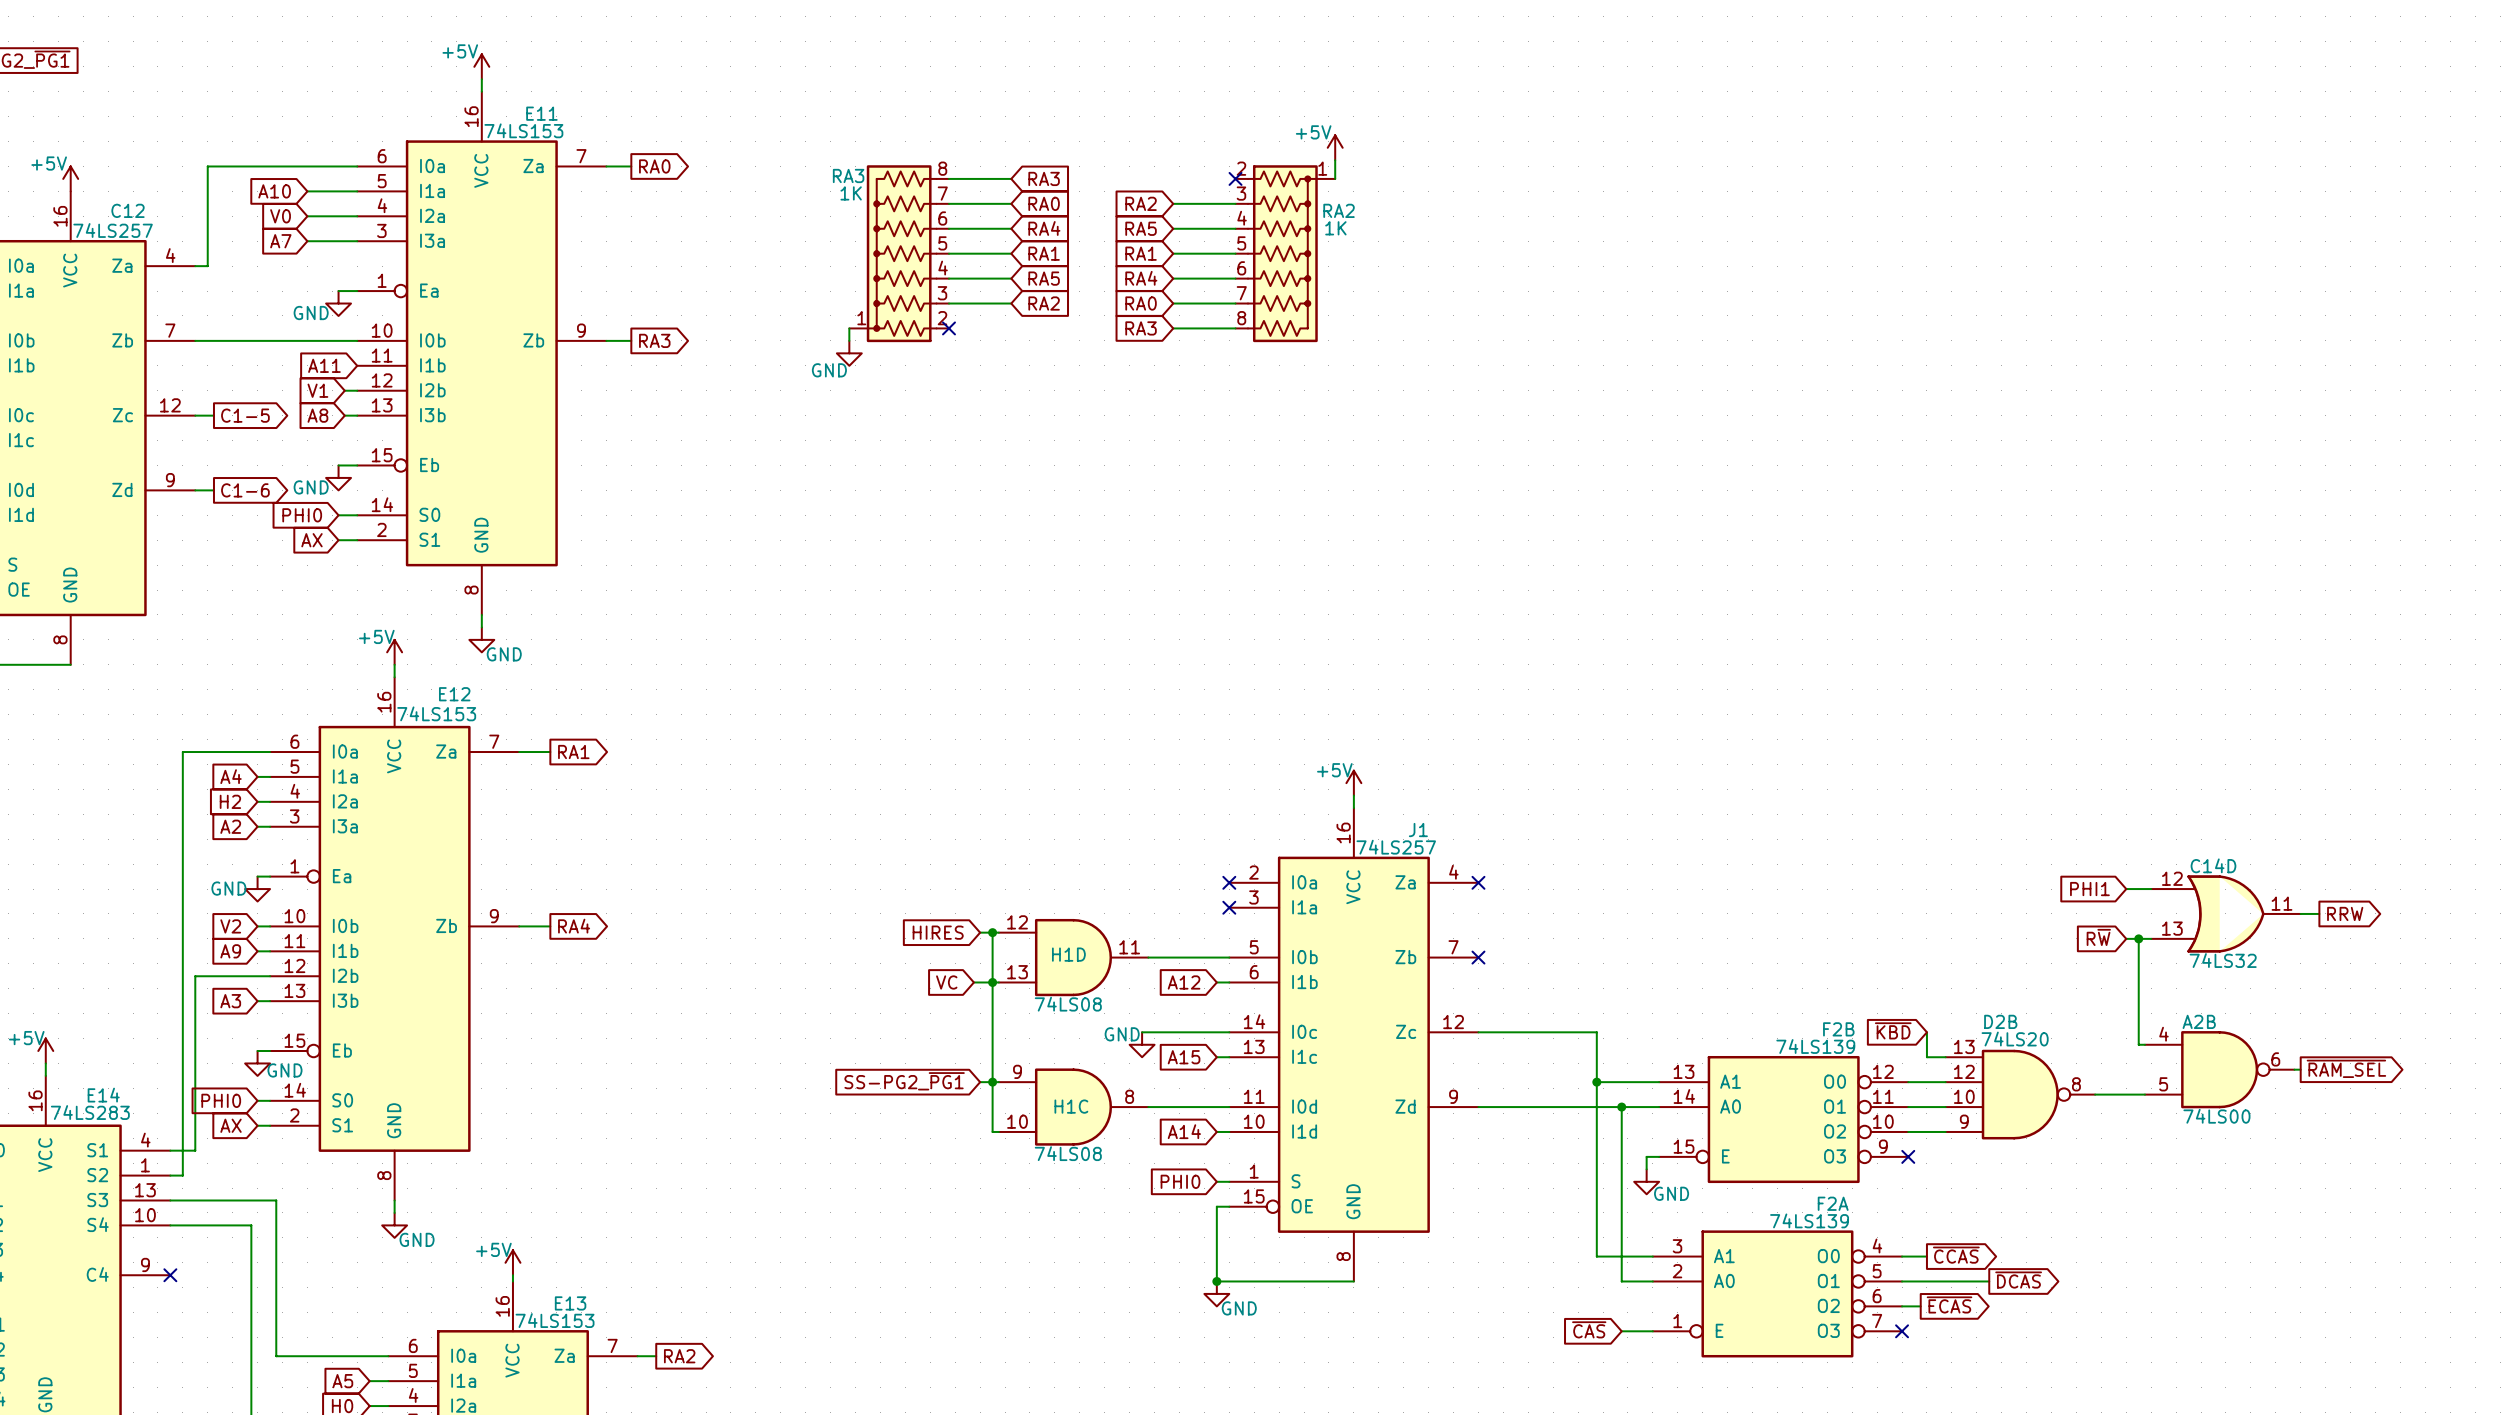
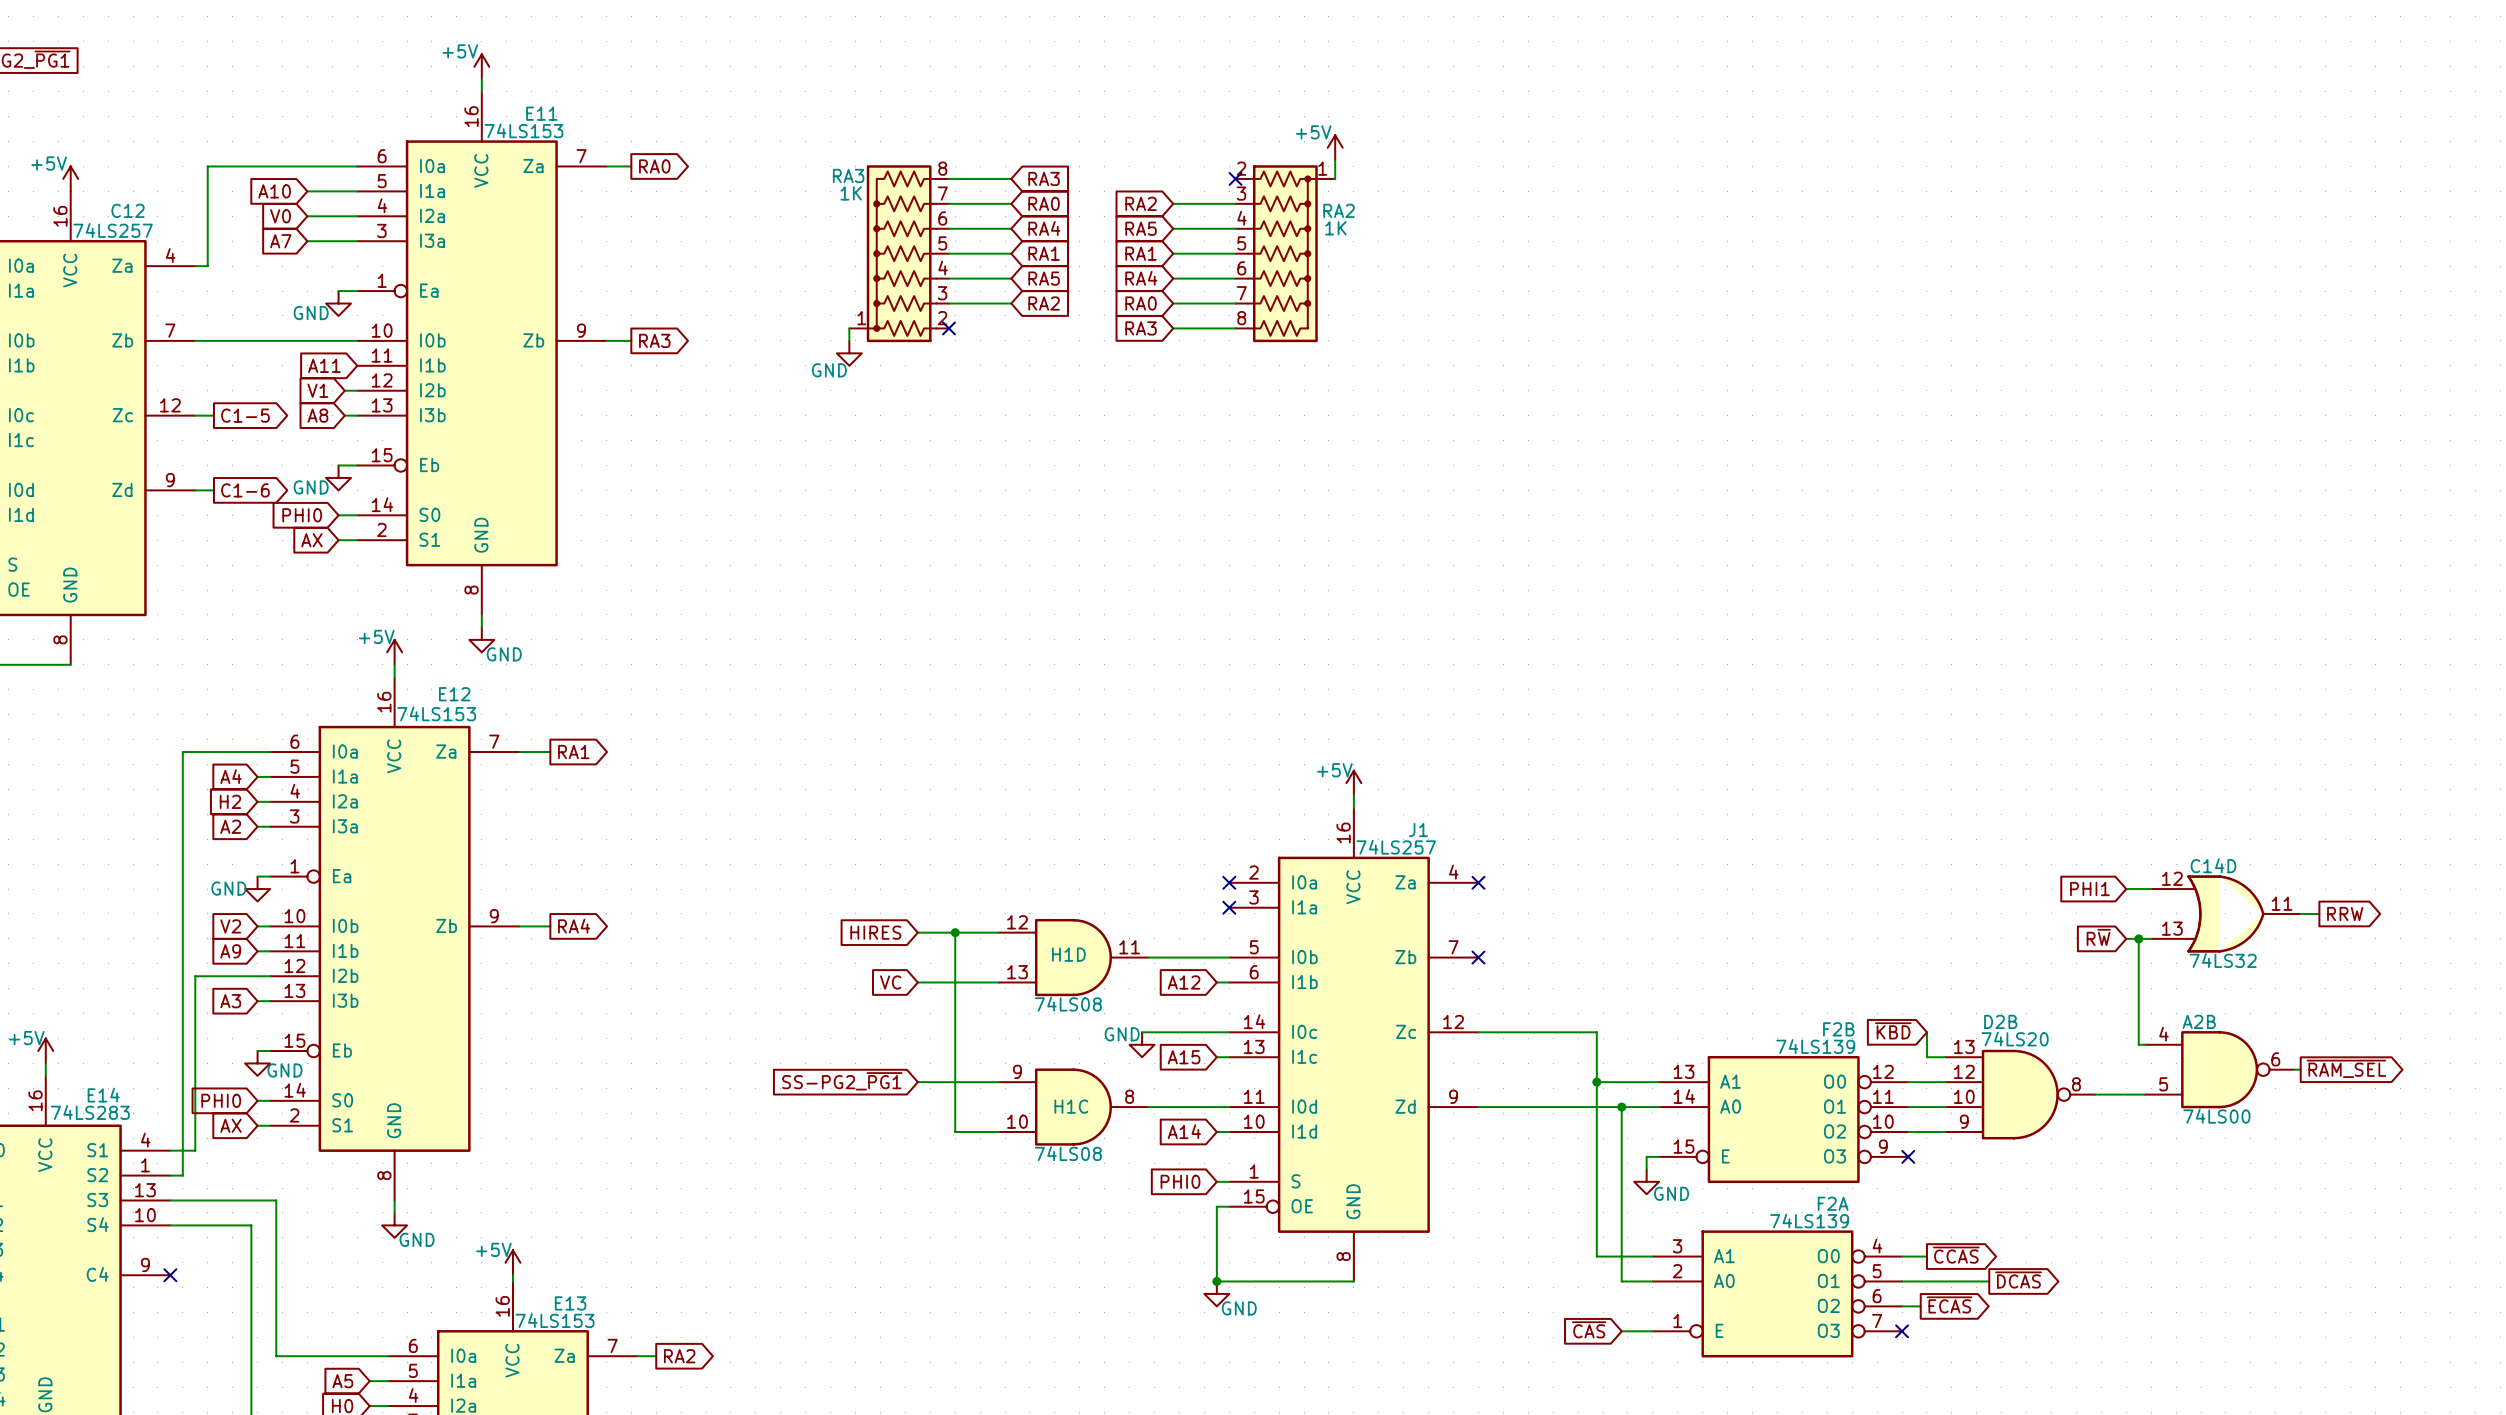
wire: none -> (917, 932) (980, 932)
global label position: HIRES (938, 932) -> HIRES (875, 932)
junction: none -> (955, 932)
wire: (992, 932) (992, 1131) -> (955, 932) (955, 1131) (992, 1131)
junction: (992, 932) -> none
wire: none -> (917, 982) (973, 982)
global label position: VC (946, 982) -> VC (890, 982)
junction: (992, 982) -> none
global label position: SS-PG2_~{PG1} (904, 1081) -> SS-PG2_~{PG1} (842, 1081)
wire: none -> (917, 1082) (980, 1082)
junction: (992, 1082) -> none

